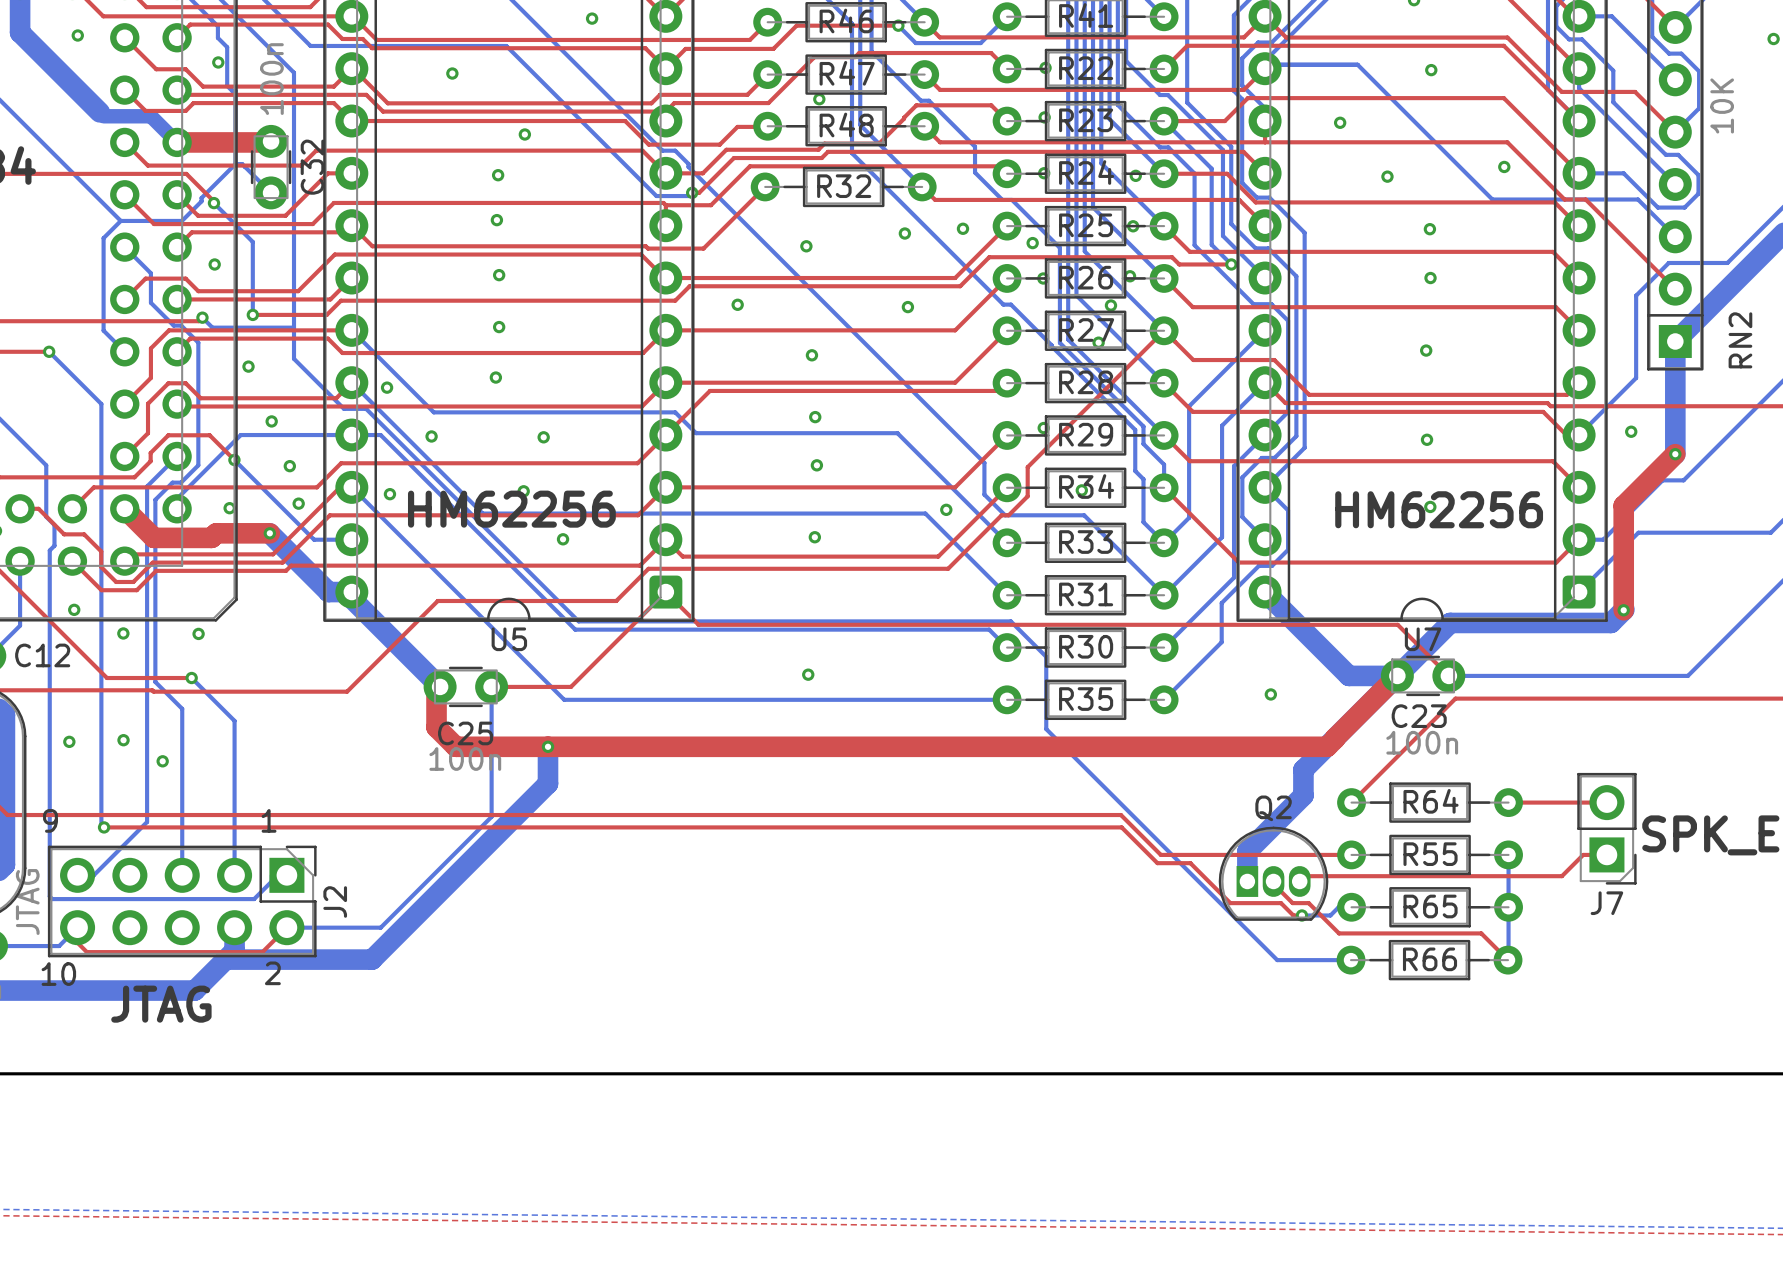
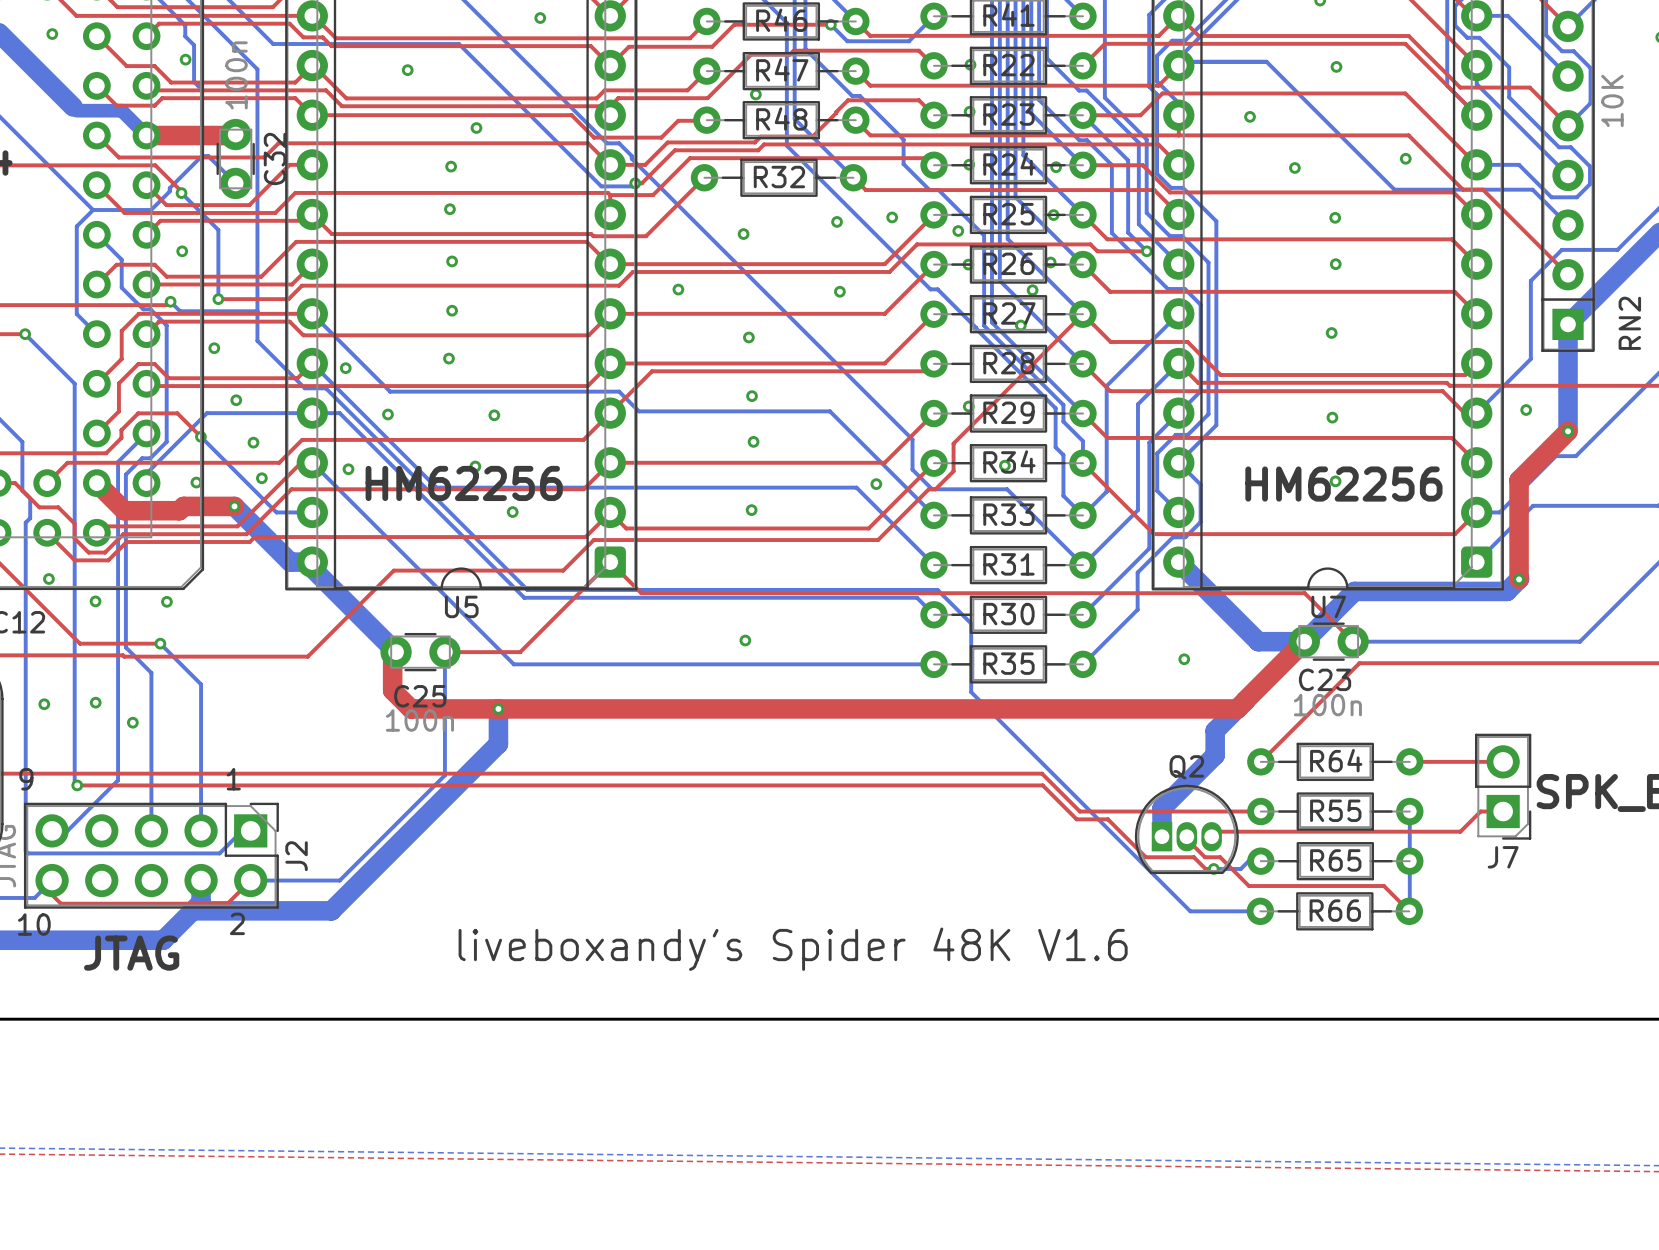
text: none -> liveboxandy's Spider 48K V1.6 (793, 949)

